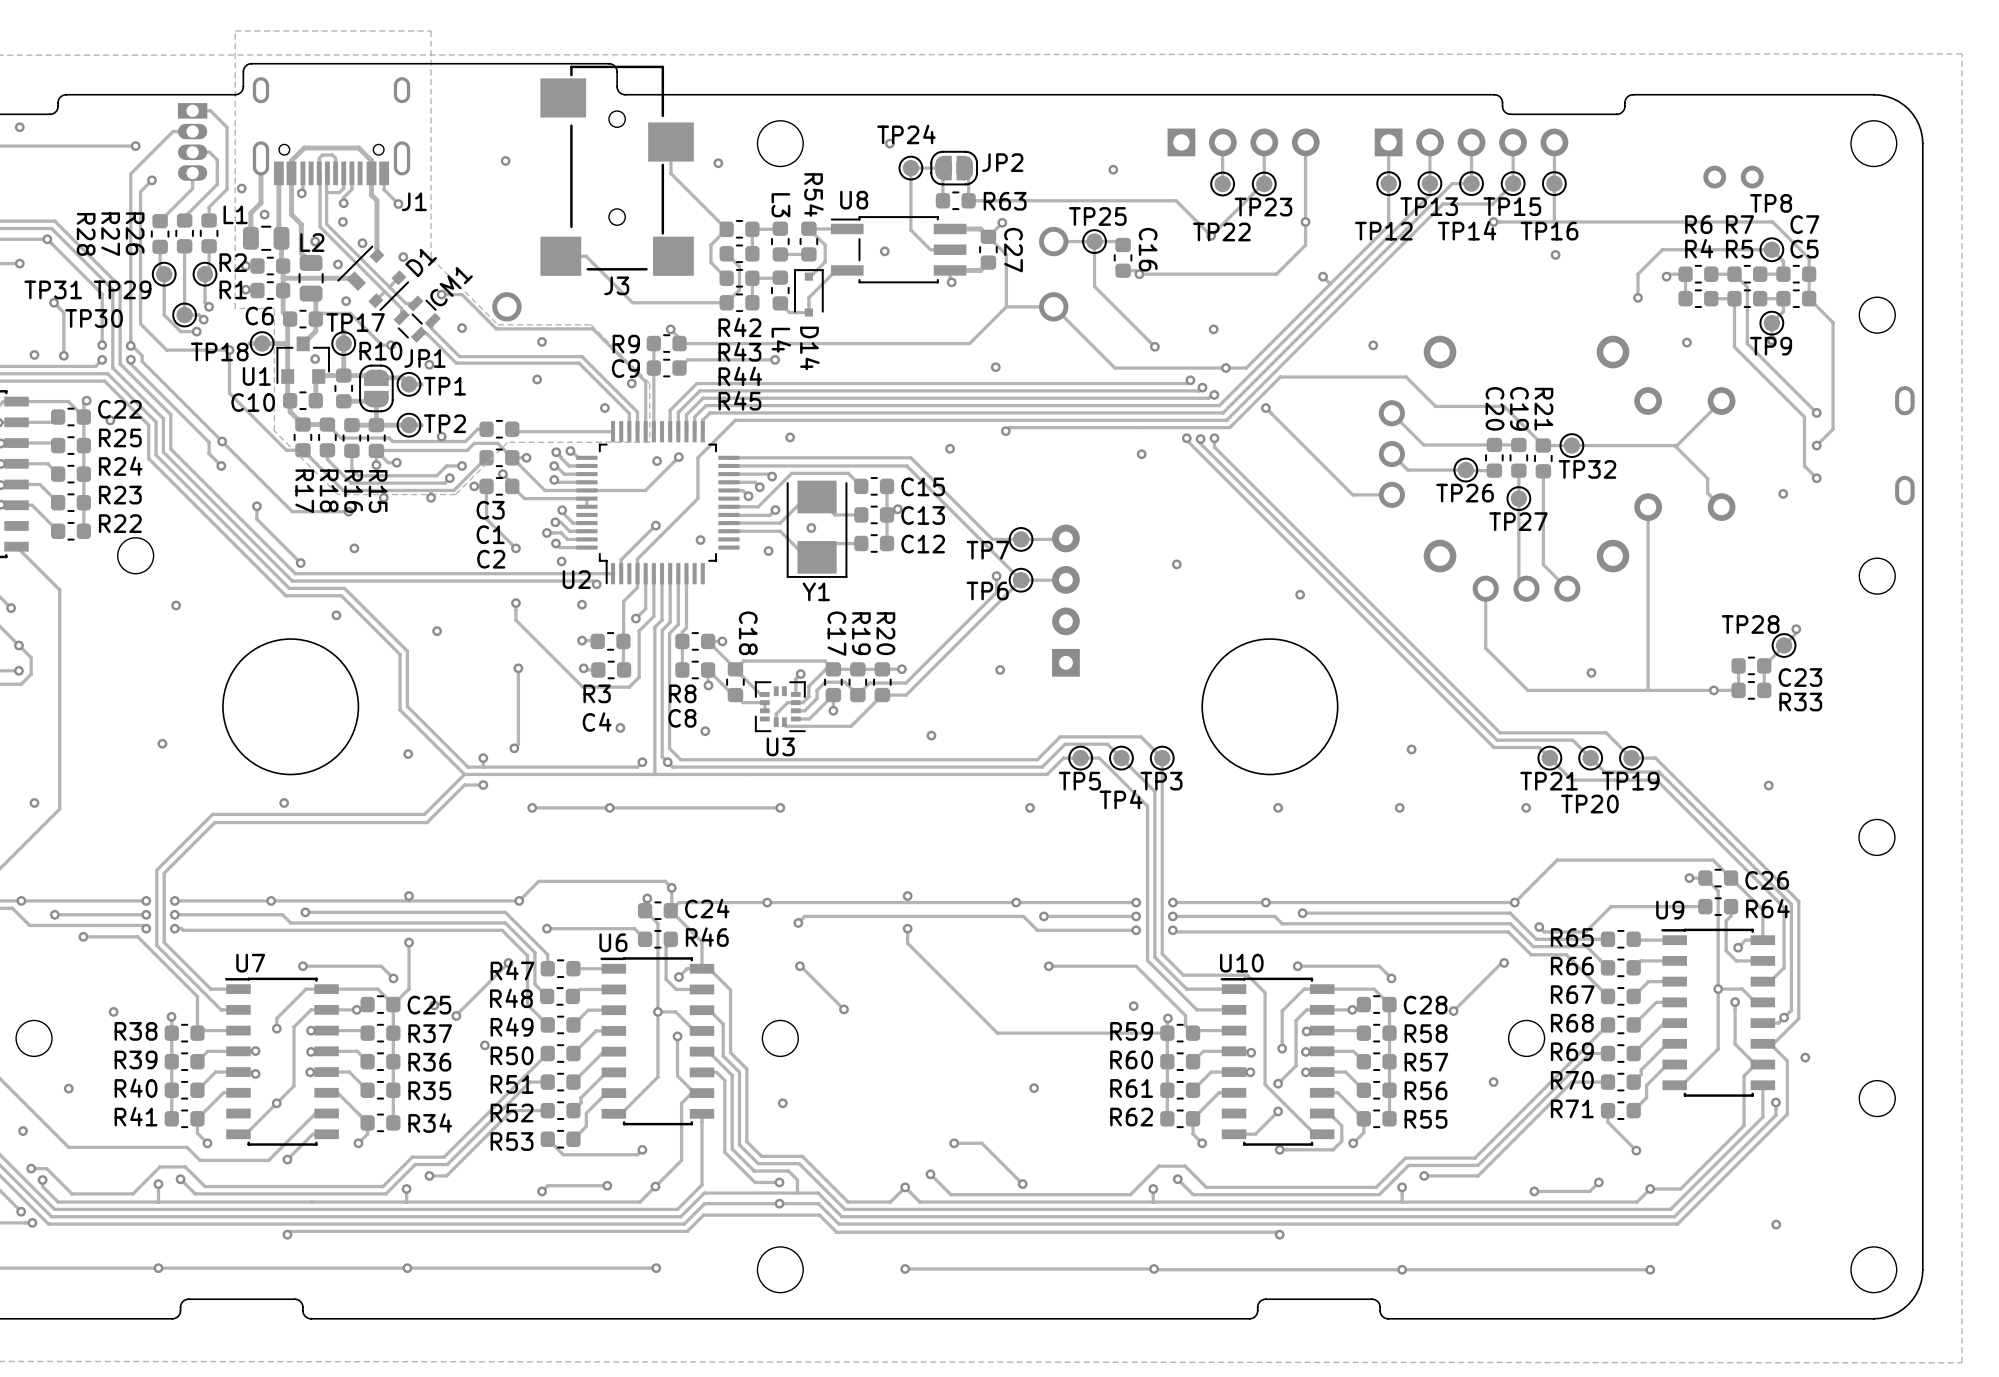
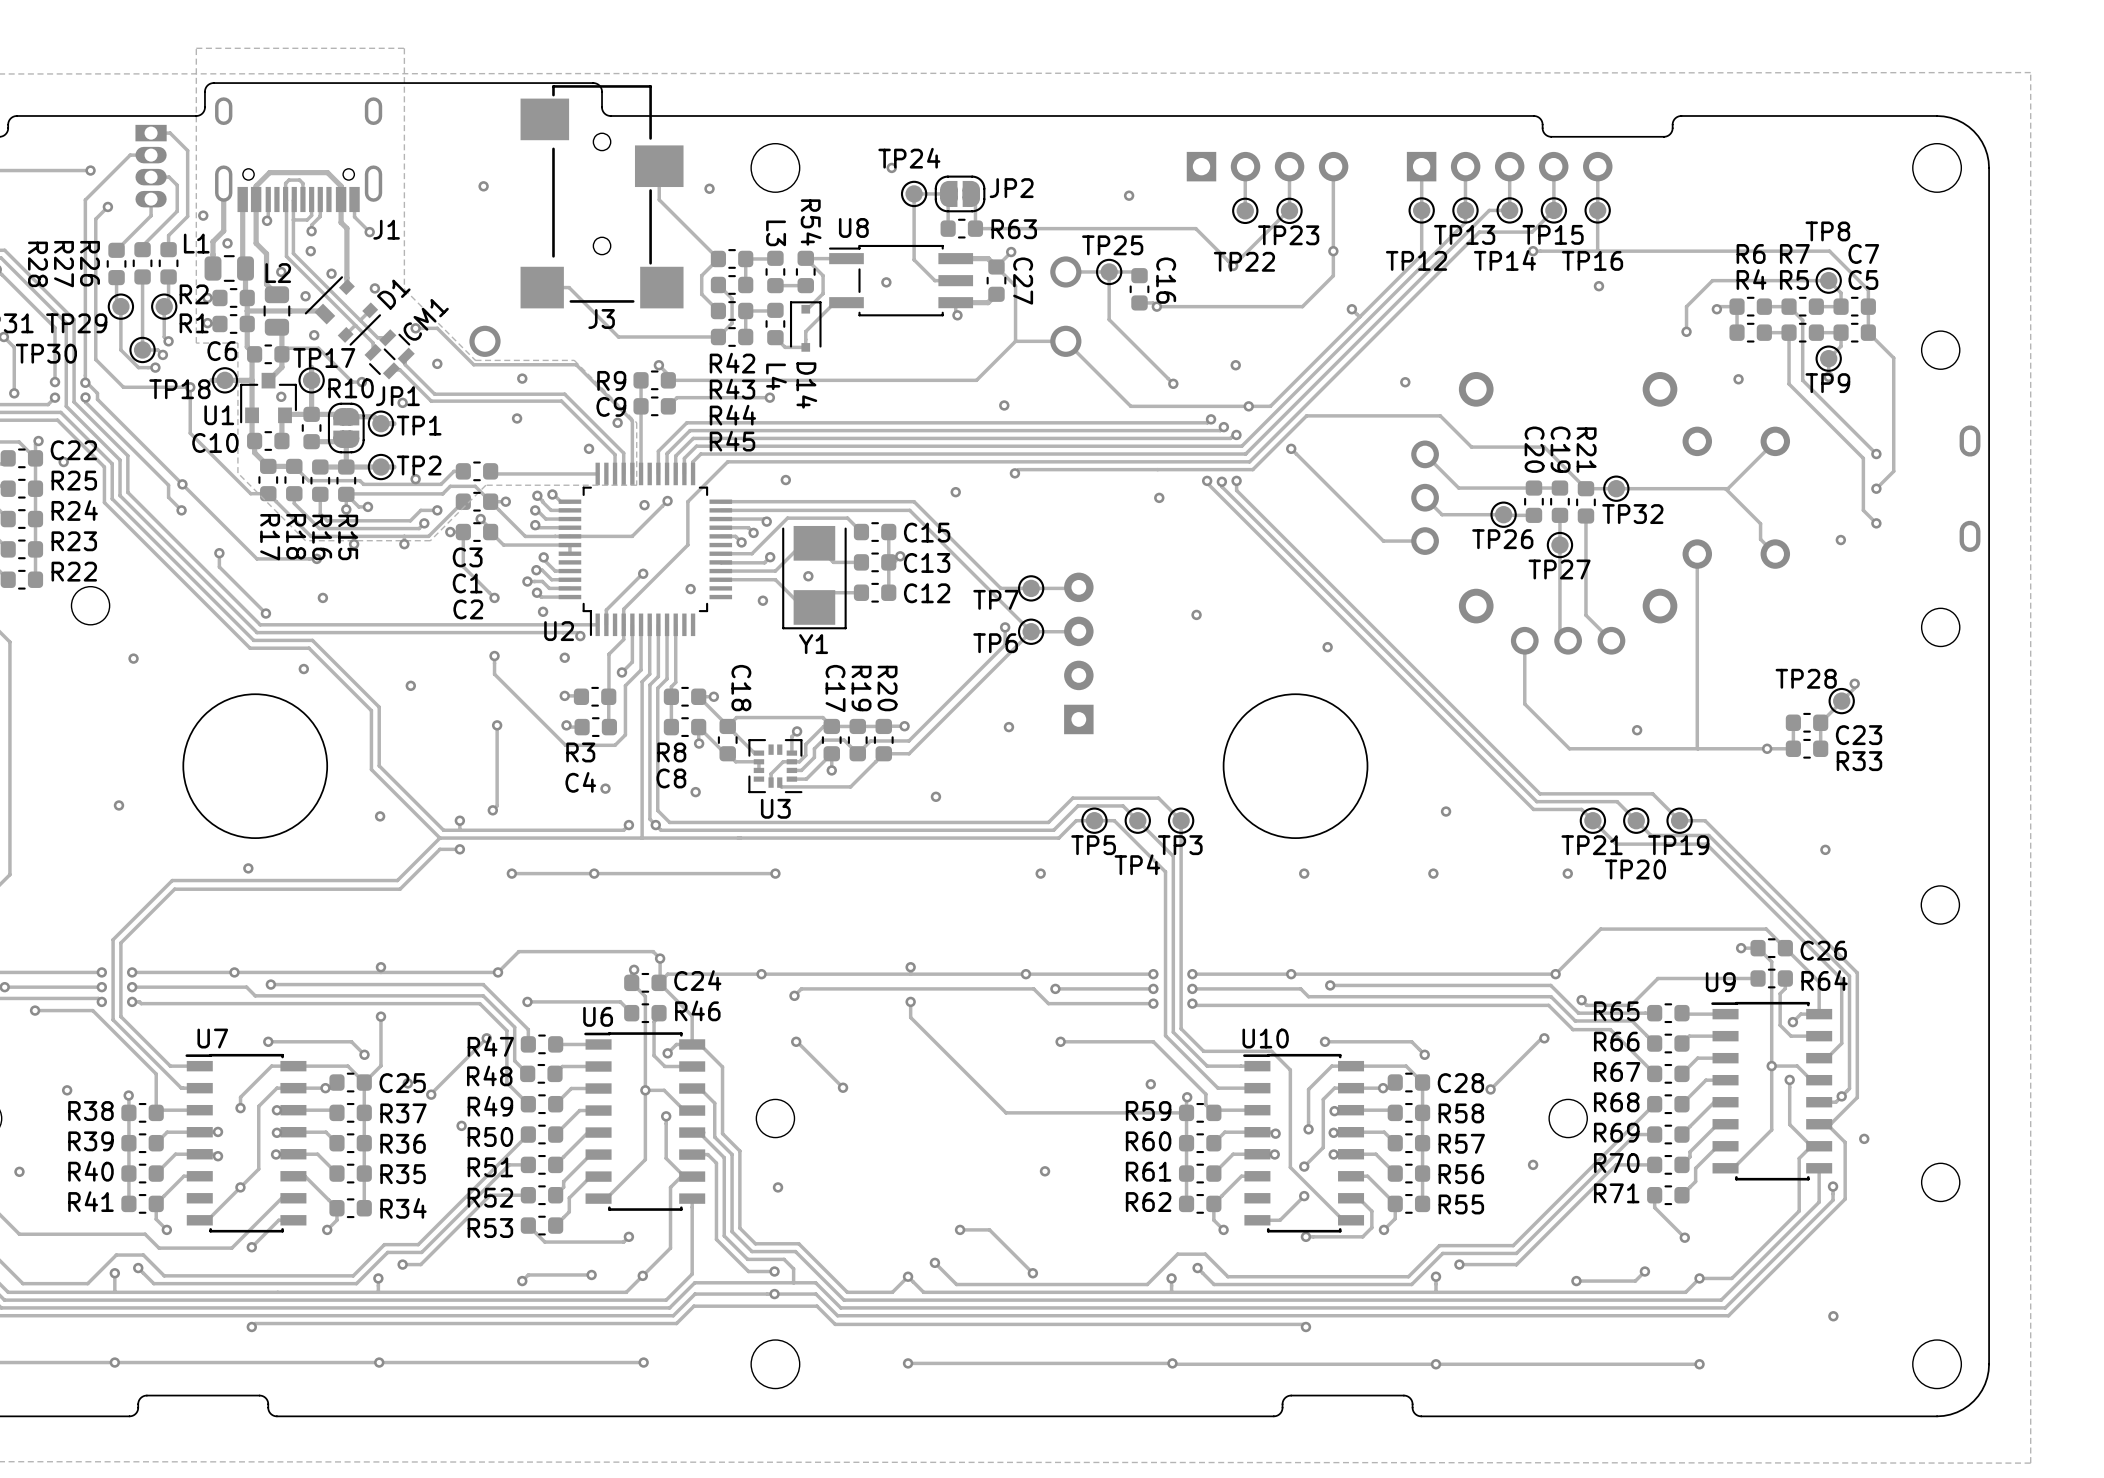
part: (1733, 177) -> none

